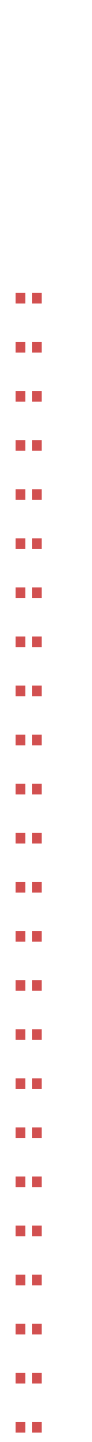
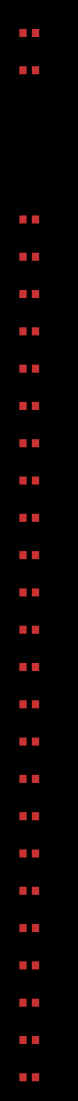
part: none -> (29, 32)
part: none -> (29, 70)

